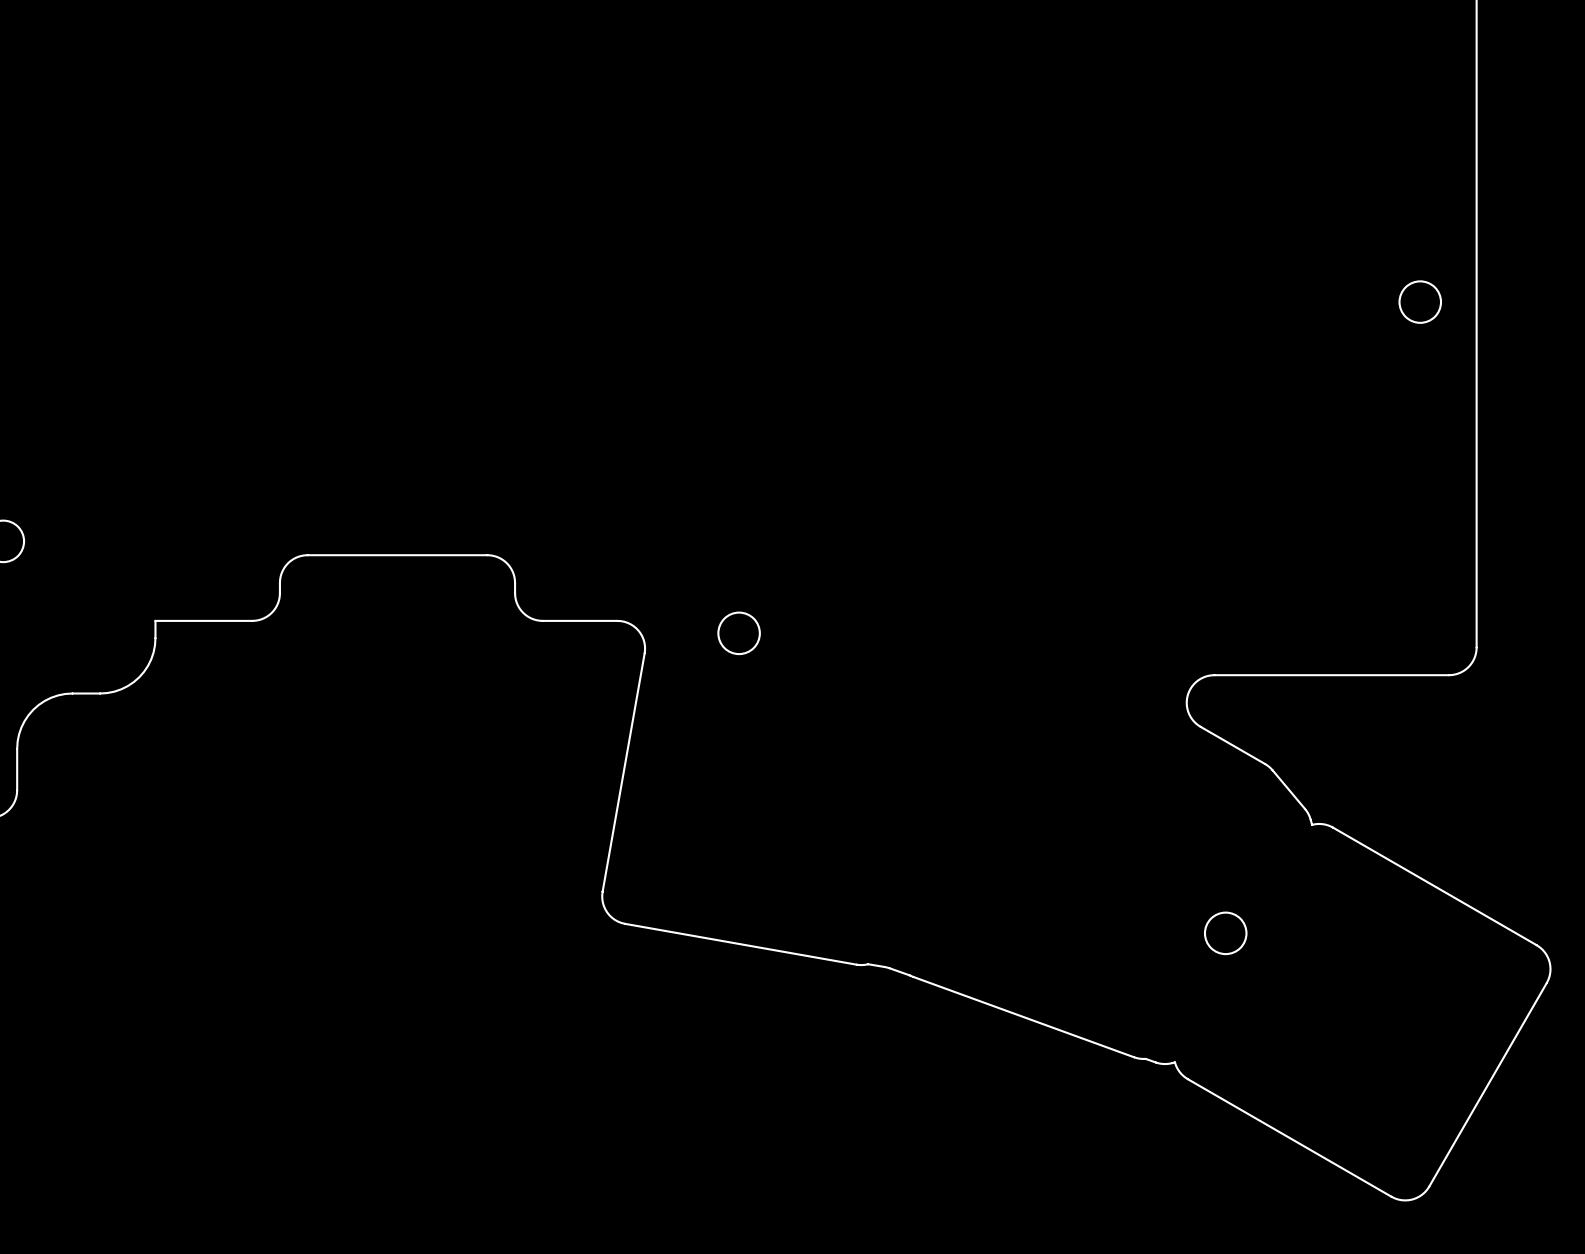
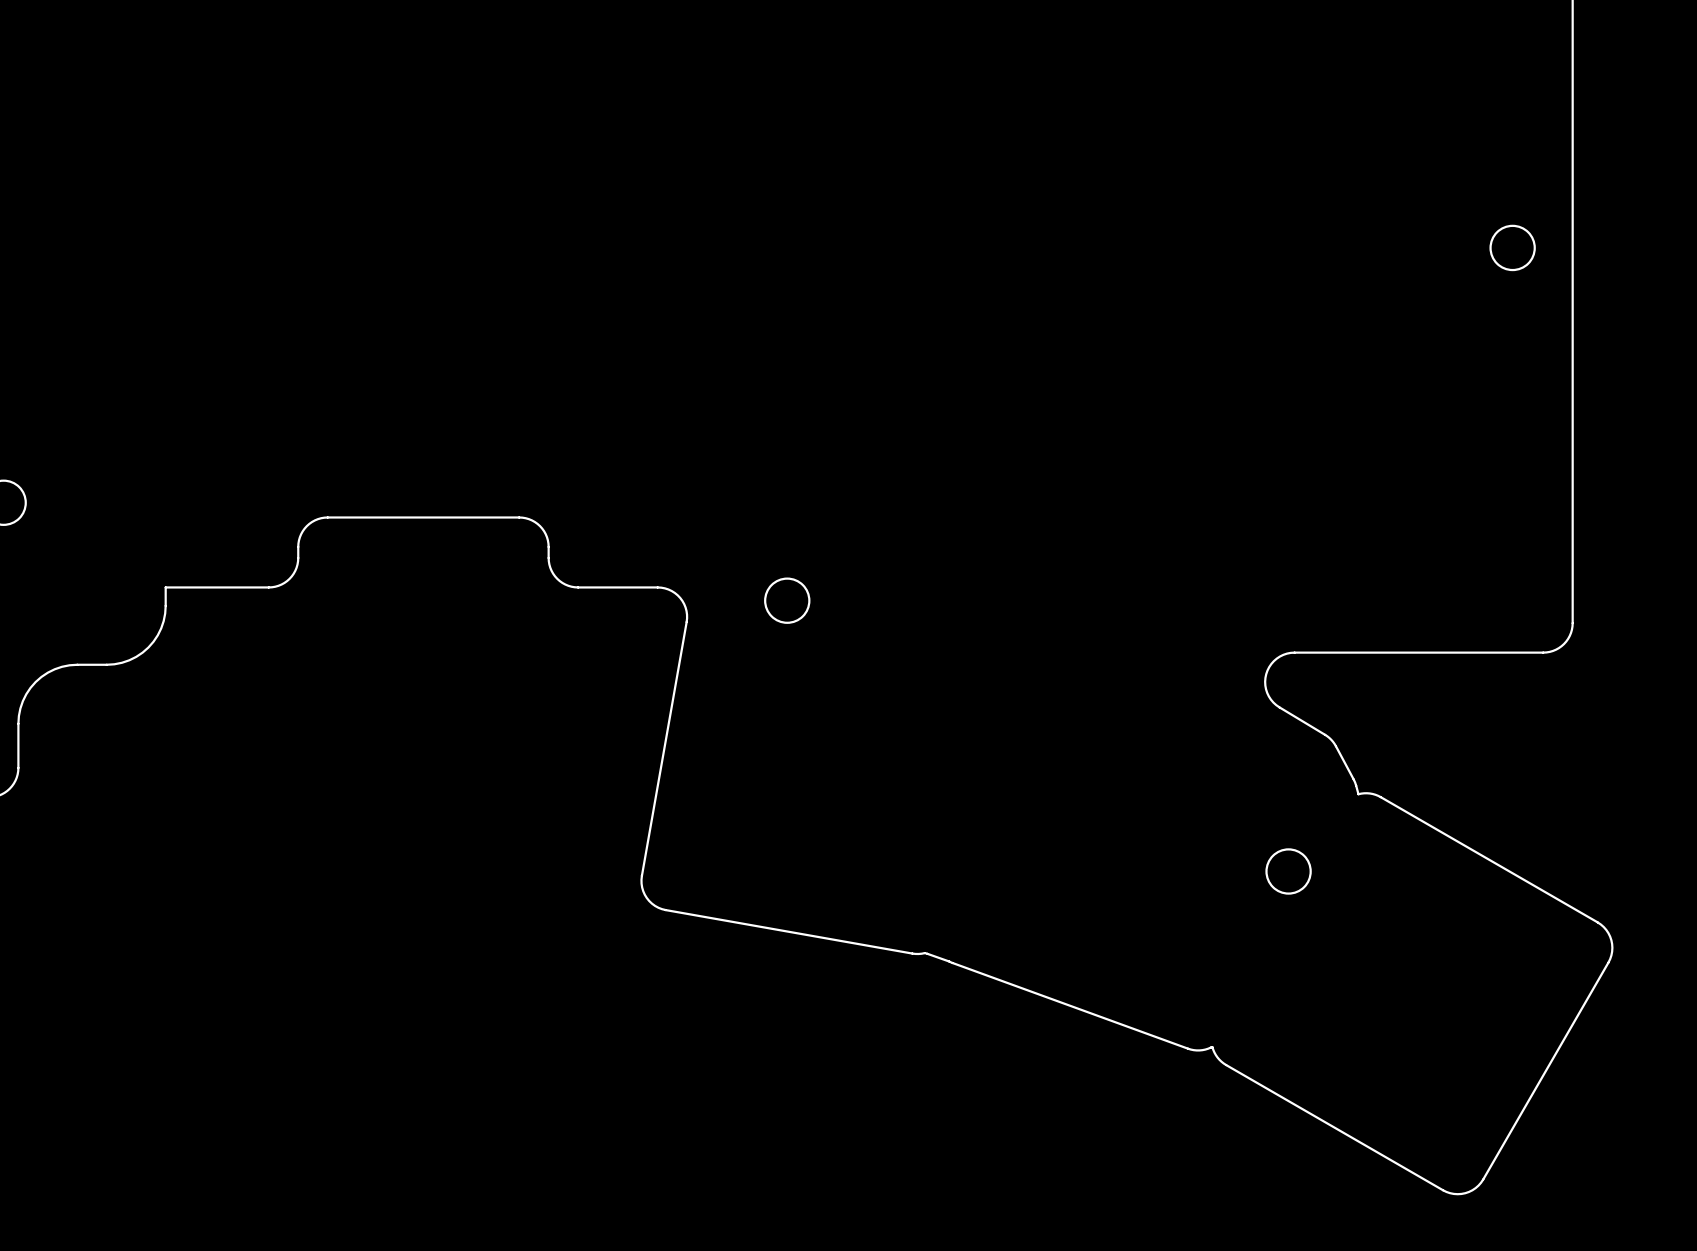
board edge: (1476, 647) (1475, 656) (1470, 664) (1463, 670) (1455, 674) (1211, 675) (1196, 681) (1190, 689) (1187, 698) (1188, 711) (1195, 722) (1269, 766) (1306, 811) (1312, 824) (1322, 824) (1333, 827) (1536, 945) (1548, 958) (1550, 969) (1546, 982) (1429, 1186) (1419, 1196) (1405, 1200) (1391, 1196) (1187, 1079) (1179, 1072) (1174, 1062) (1161, 1063) (1134, 1057) (889, 968) (868, 964) (856, 964) -> (1572, 615) (1571, 629) (1568, 638) (1561, 646) (1549, 651) (1290, 652) (1273, 661) (1265, 677) (1267, 692) (1273, 702) (1333, 741) (1353, 779) (1358, 794) (1369, 793) (1380, 797) (1597, 922) (1603, 927) (1610, 936) (1612, 951) (1608, 962) (1483, 1179) (1472, 1190) (1457, 1194) (1443, 1190) (1226, 1065) (1217, 1057) (1212, 1047) (1199, 1050) (1188, 1048) (927, 953) (912, 953)
round board edge position: (1225, 933) -> (1288, 871)

